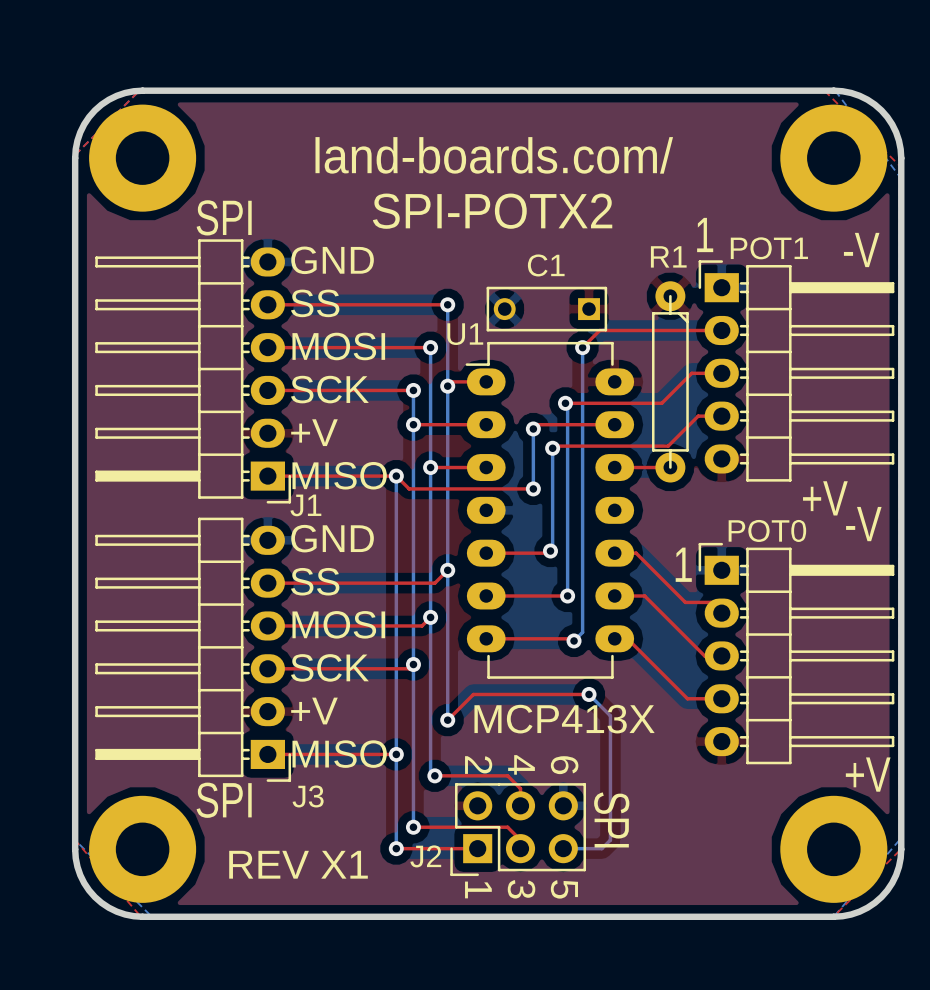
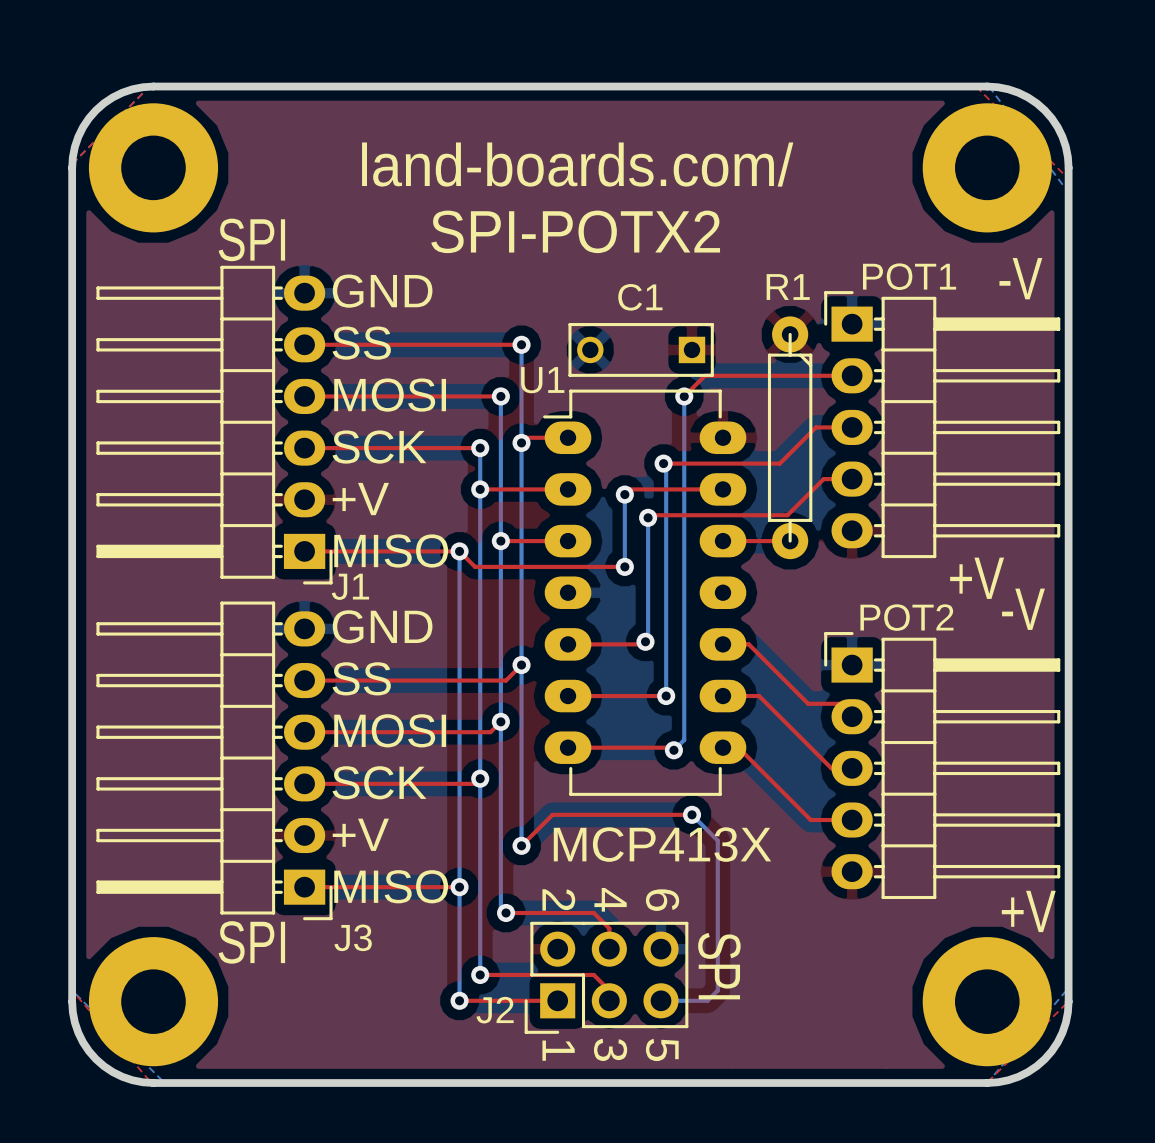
text: 1 (705, 235) -> none
POT0 name: POT0 (767, 530) -> POT2 (906, 617)
text: 1 (683, 564) -> none
text: REV X1 (298, 864) -> none

